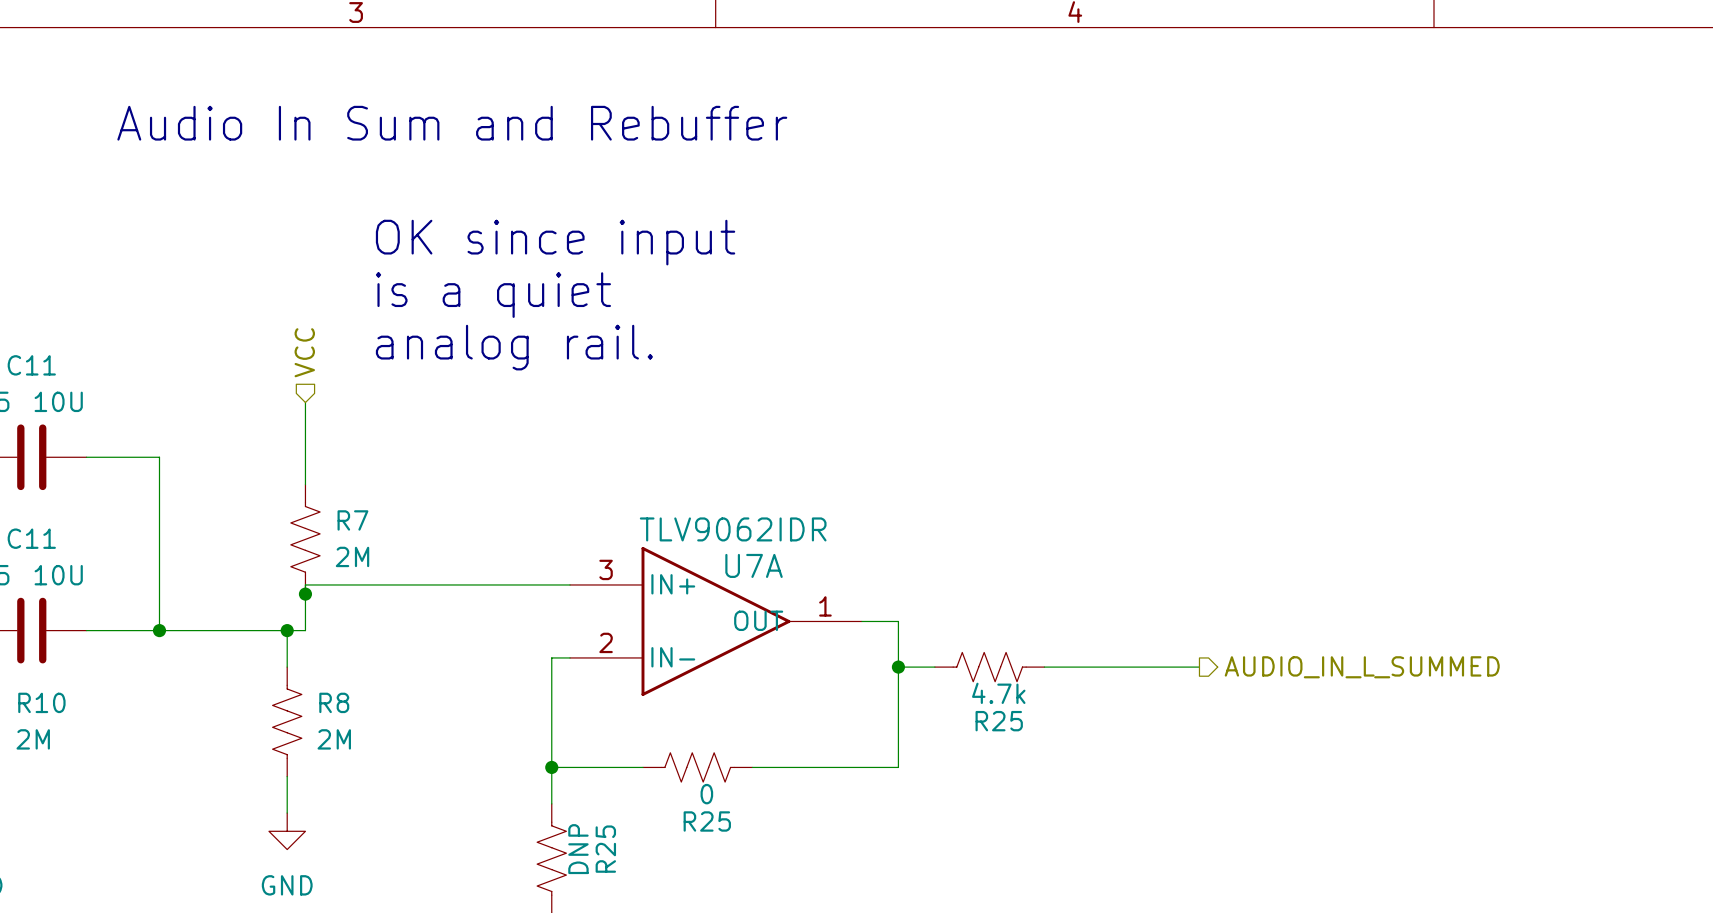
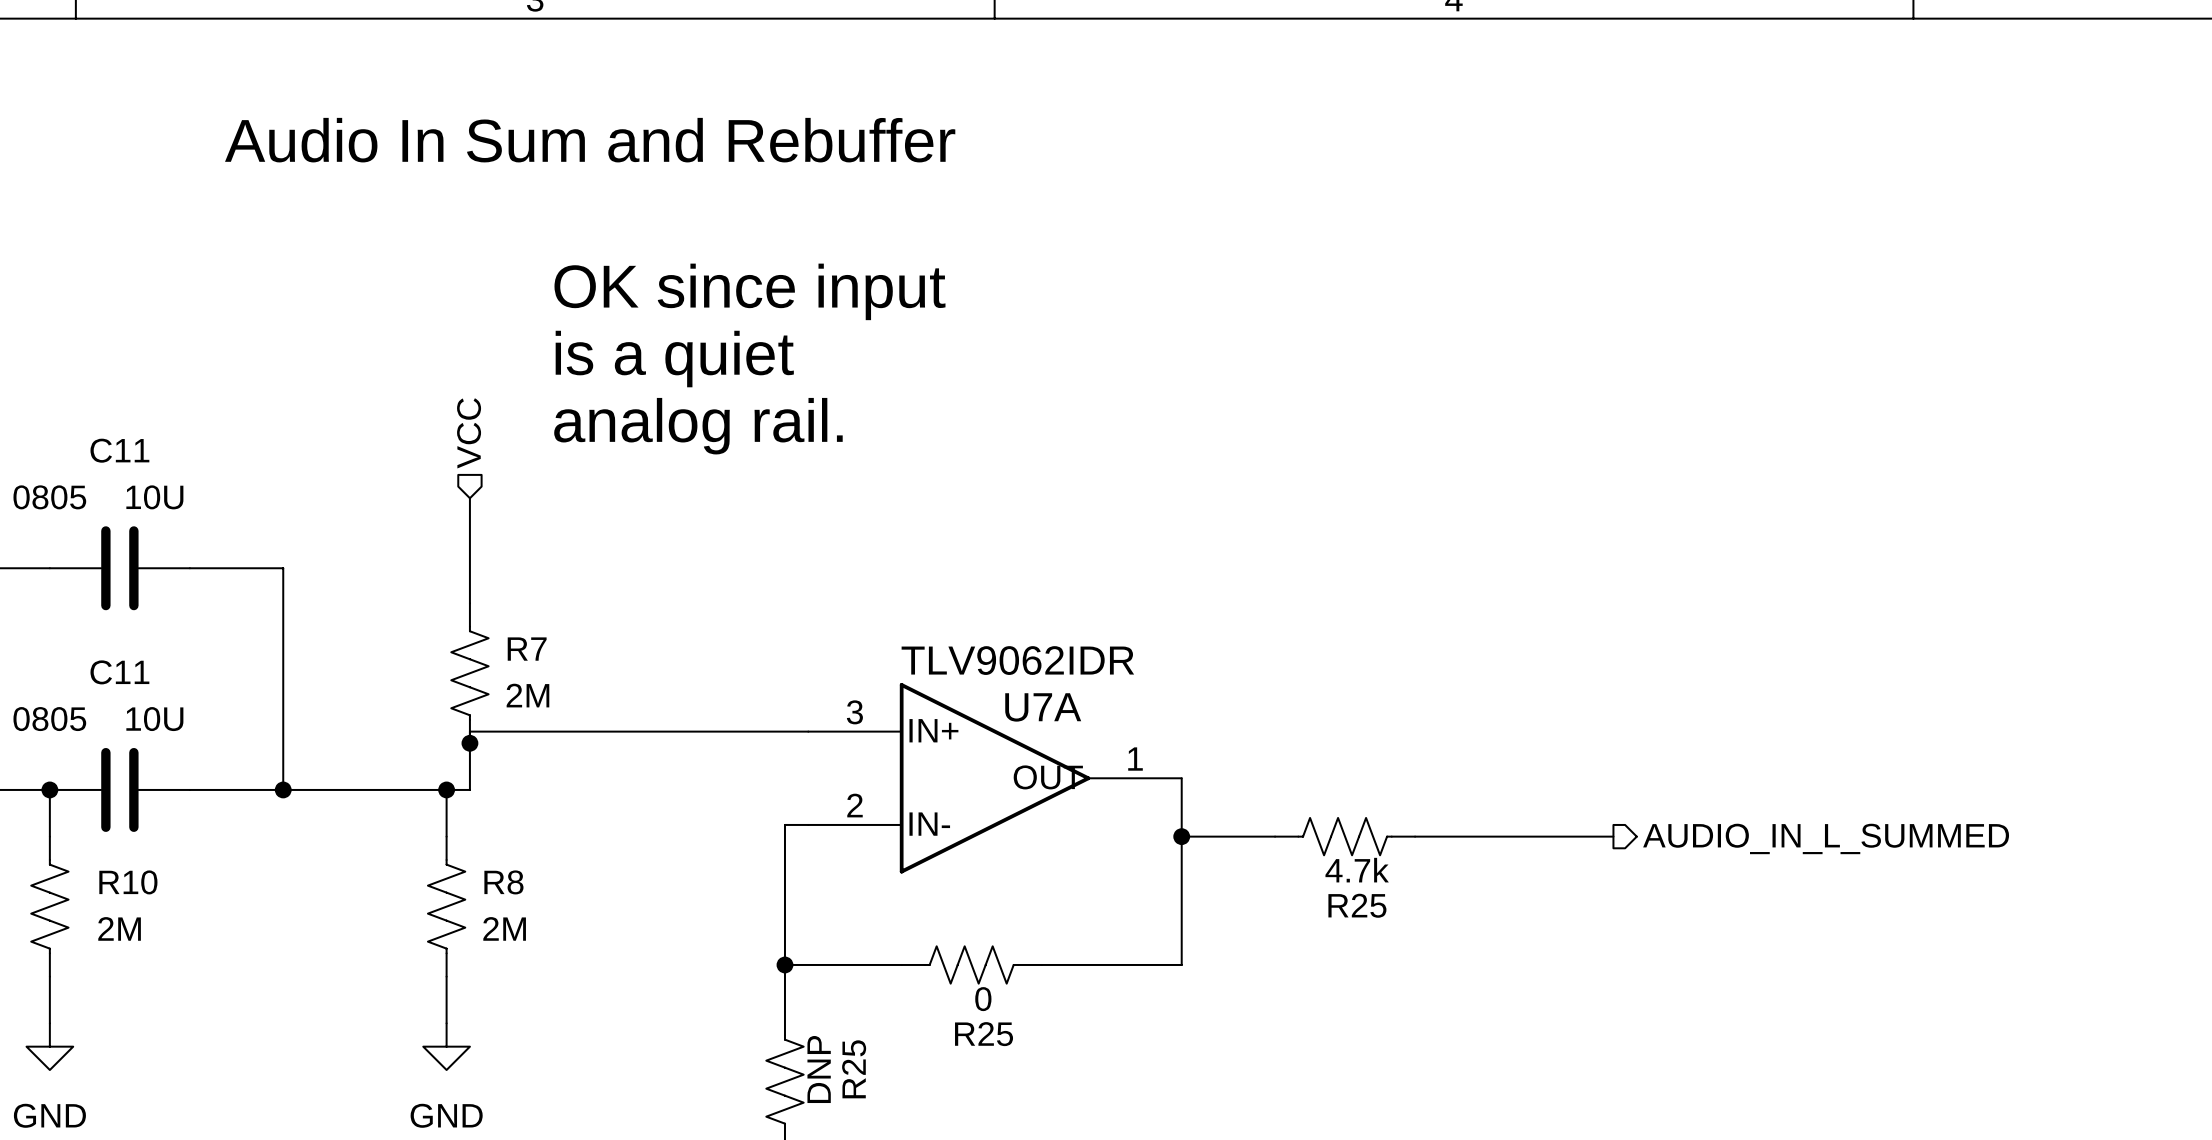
wire: (861, 621) (898, 621) (898, 767) (861, 767) -> (1181, 778) (1181, 964)
wire: none -> (1181, 836) (1228, 836)
junction position: (898, 667) -> (1181, 836)

